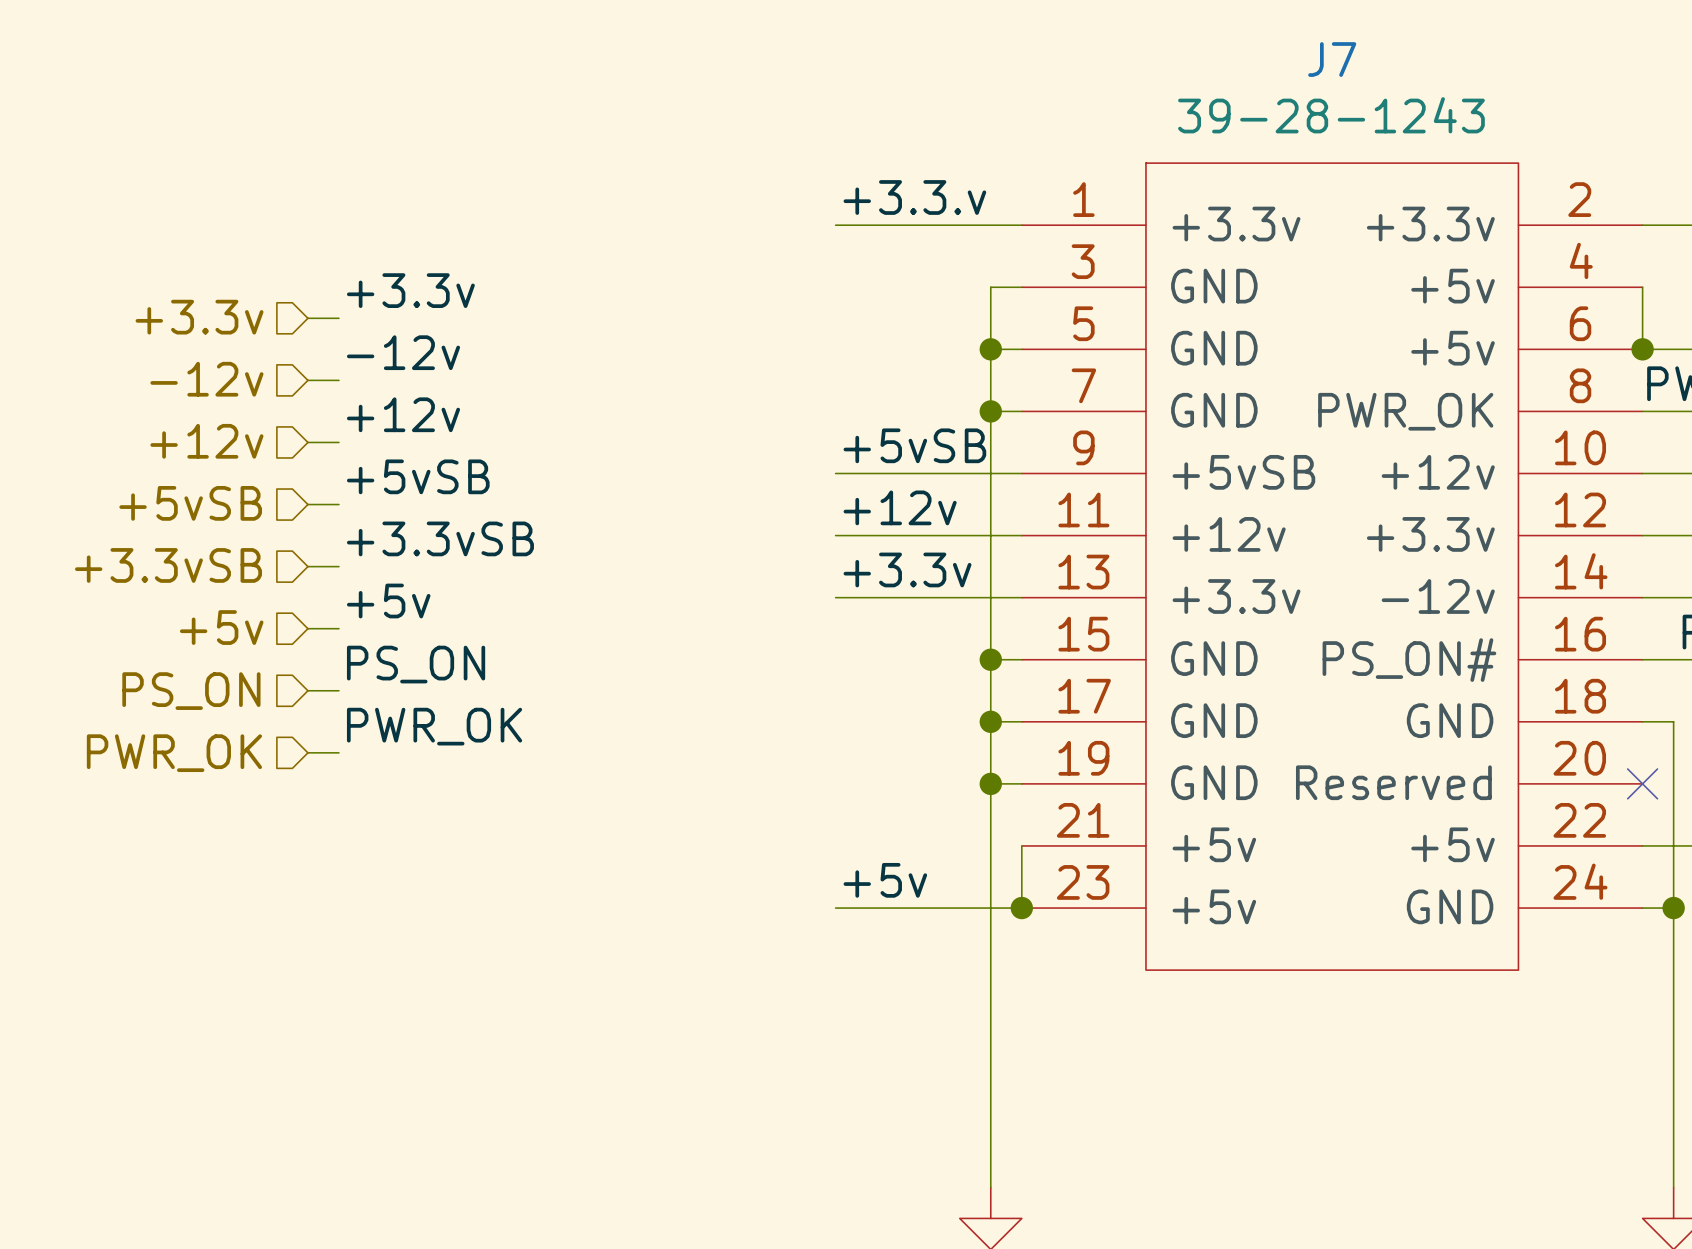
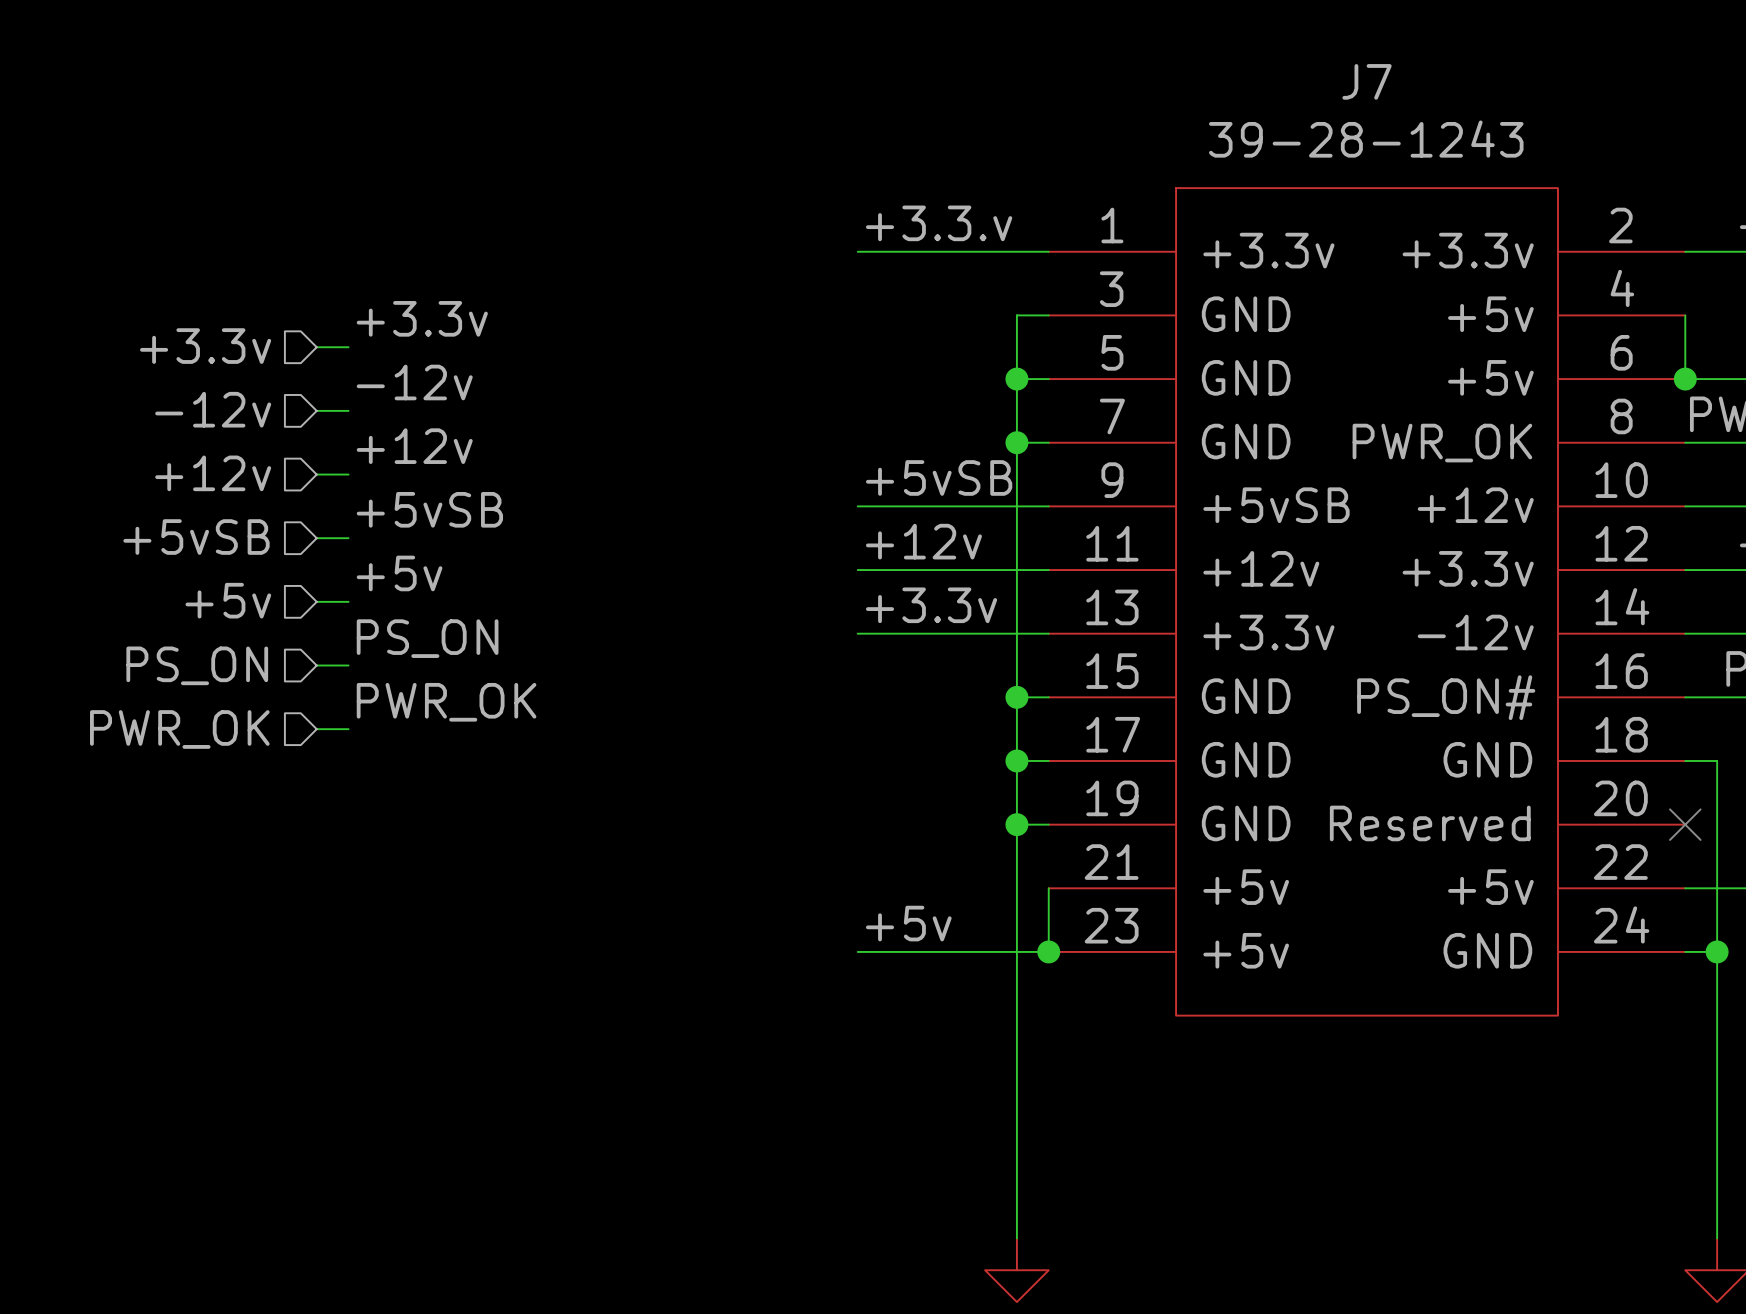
label: +3.3vSB (440, 538) -> +5v (399, 573)
hierarchical label: +3.3vSB (168, 565) -> +5v (228, 600)
label: +5v (388, 601) -> PS_ON (427, 638)
hierarchical label: +5v (221, 627) -> PS_ON (197, 665)
label: PS_ON (416, 664) -> PWR_OK (446, 702)
hierarchical label: PS_ON (191, 691) -> PWR_OK (179, 729)
label: PWR_OK (434, 726) -> none
wire: (307, 752) (338, 752) -> none
hierarchical label: PWR_OK (174, 753) -> none

